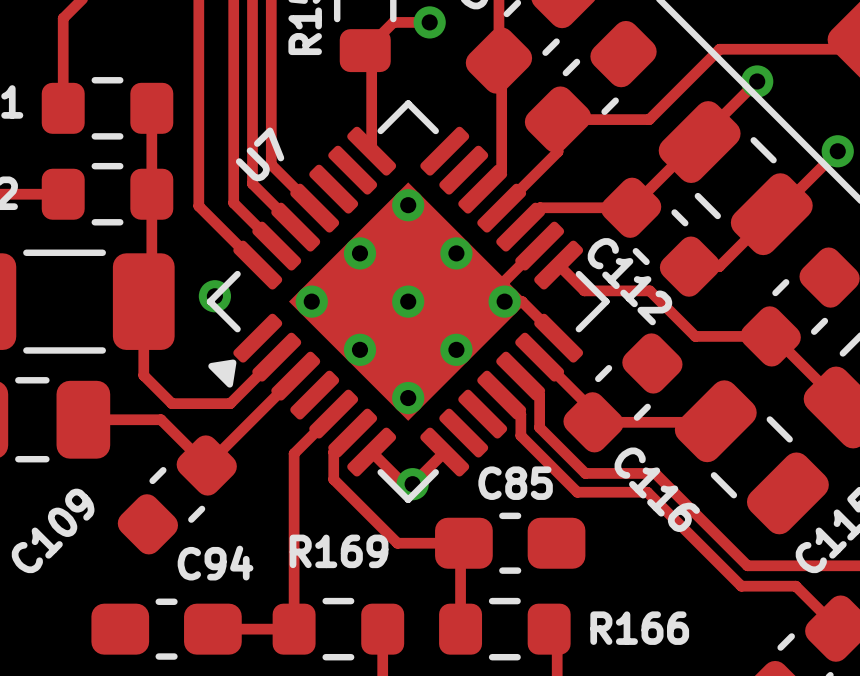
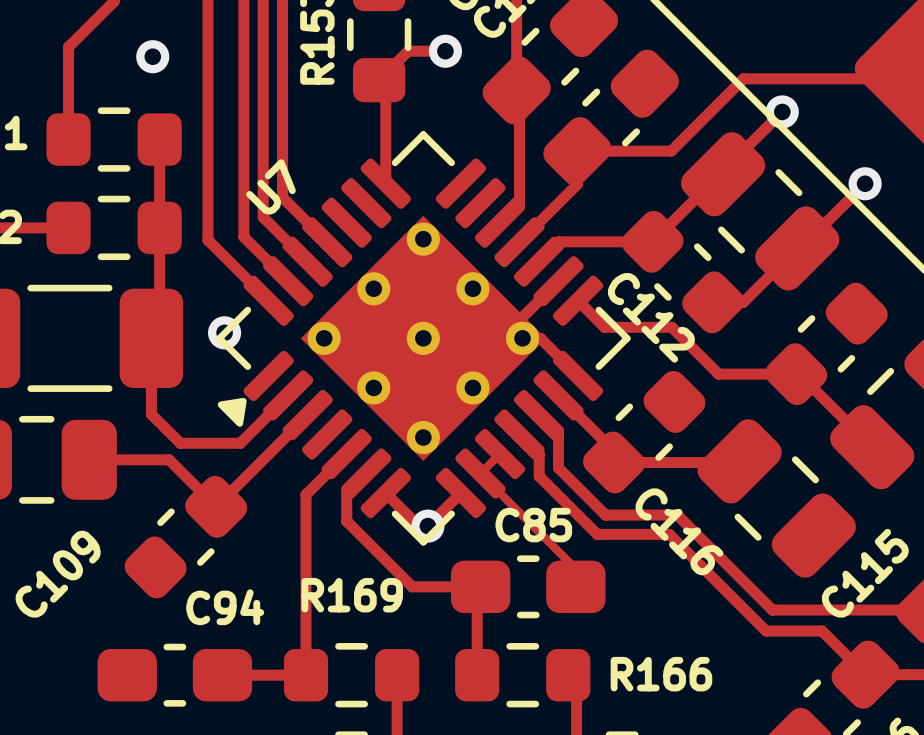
via: none -> (152, 56)
track: none -> (499, 454) (480, 473) (575, 568) (575, 586)

